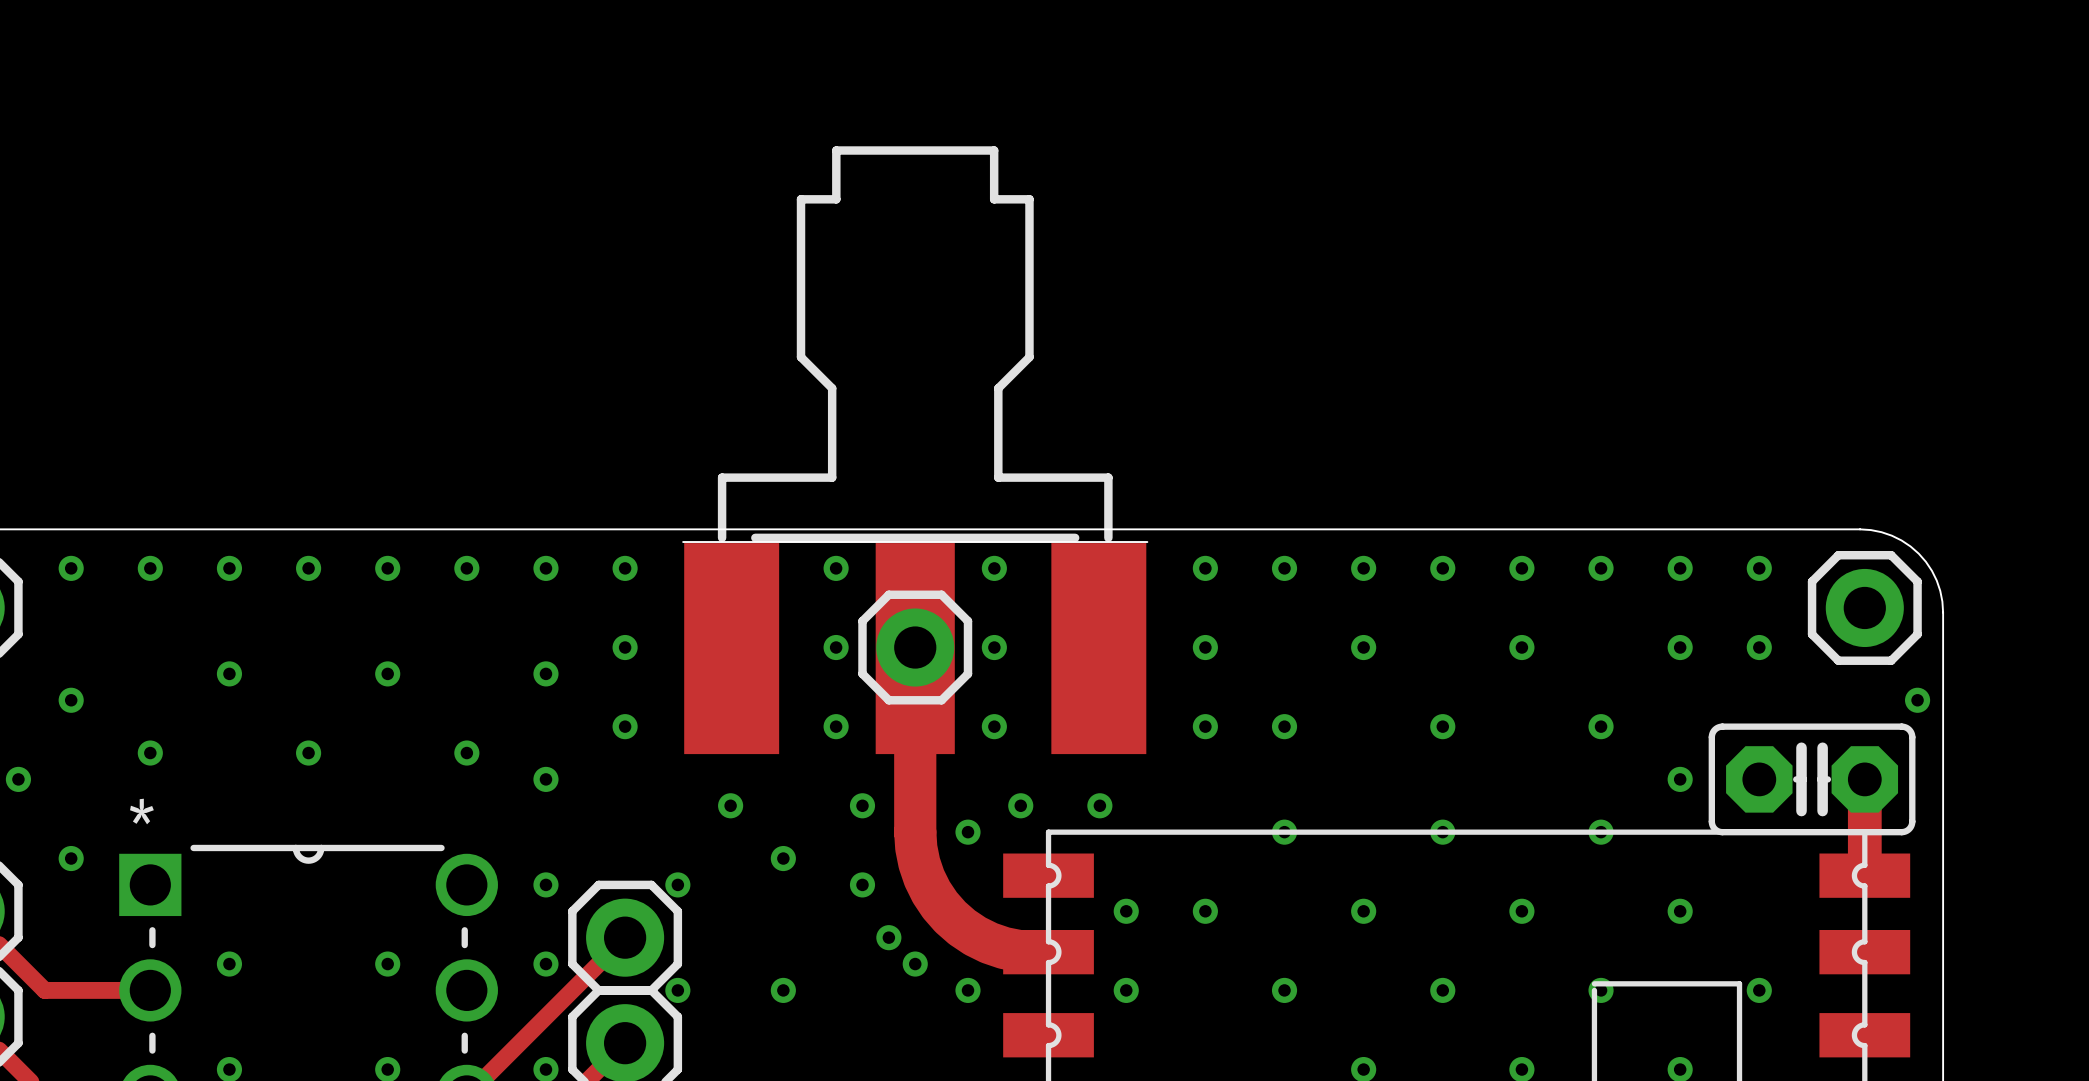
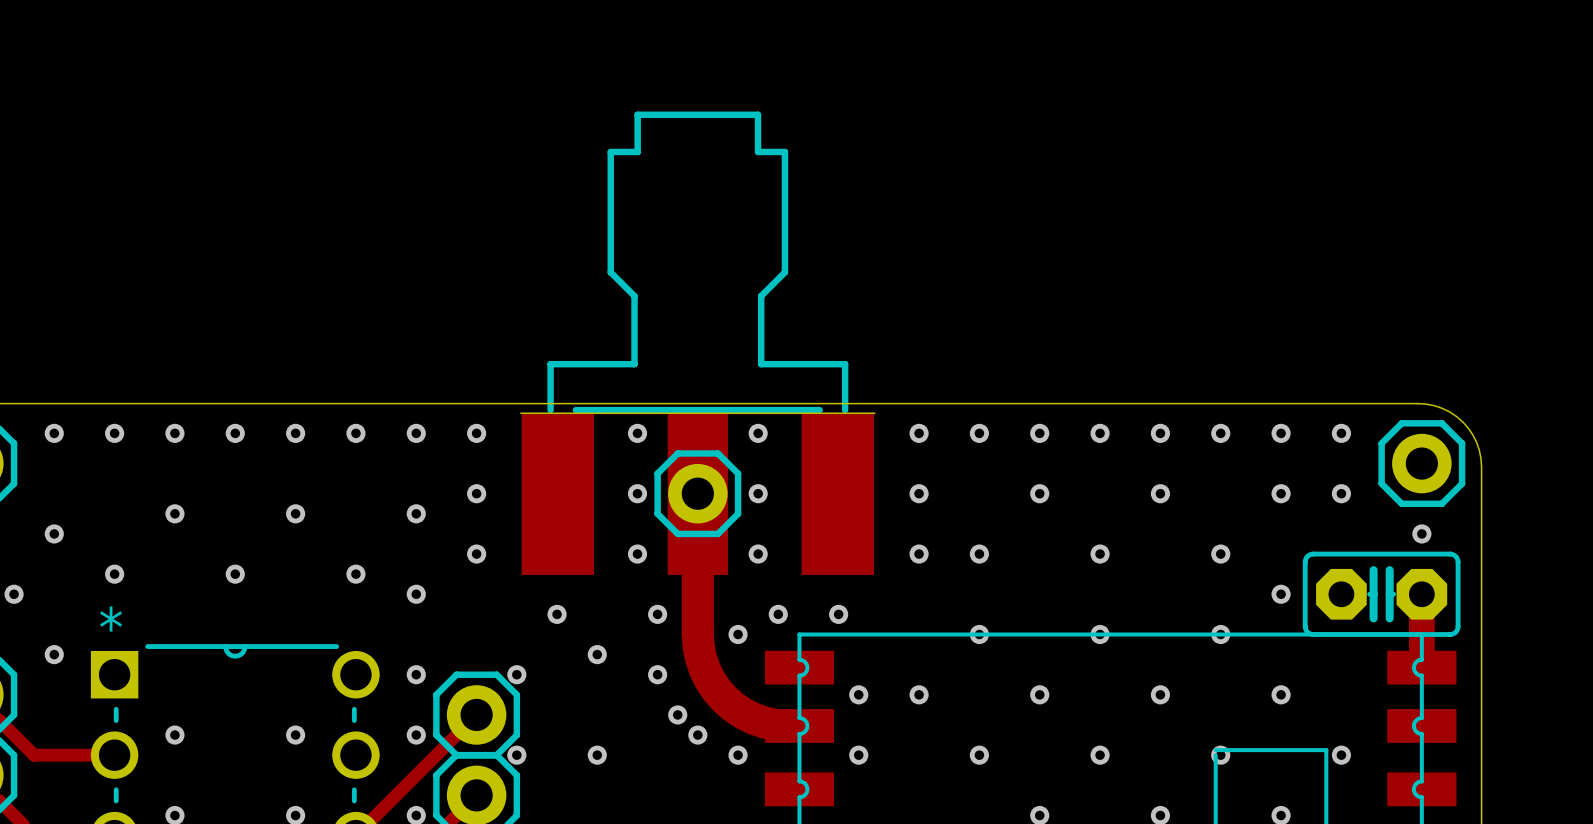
via position: (1917, 700) -> (1421, 533)

